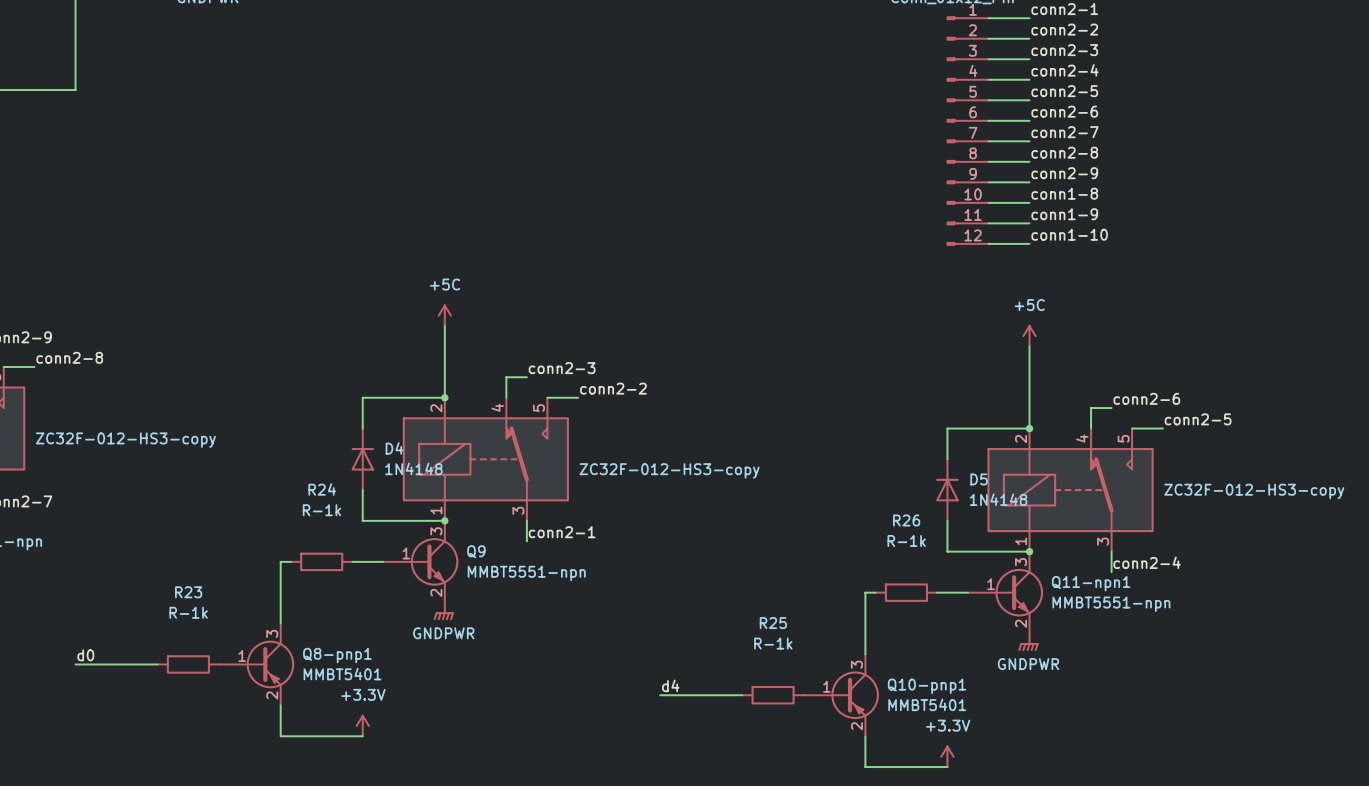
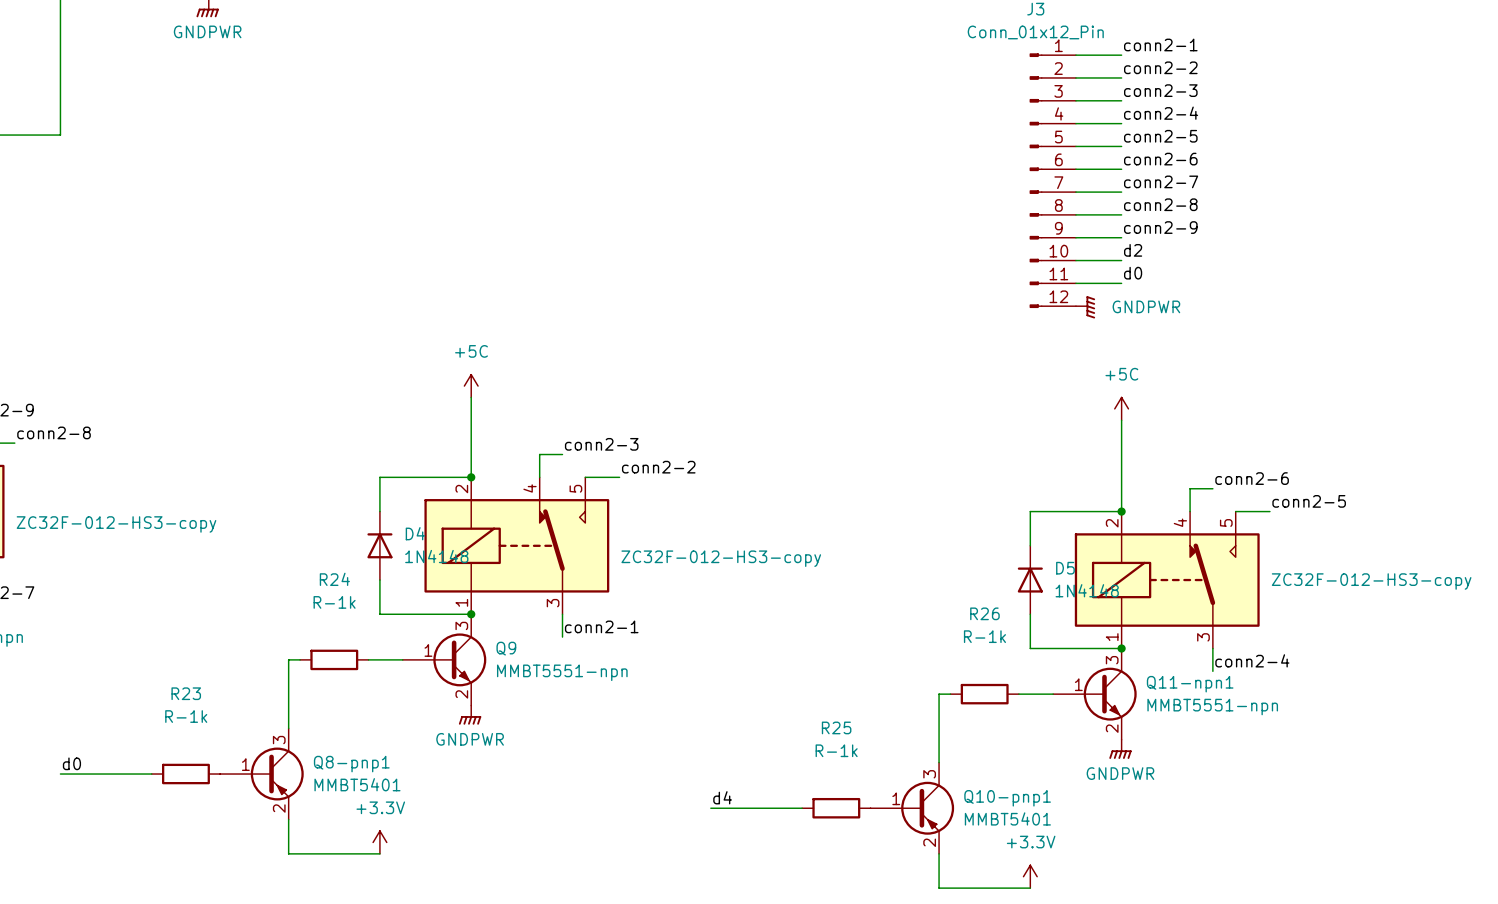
label: conn1-8 (1064, 193) -> d2 (1133, 250)
label: conn1-9 (1064, 214) -> d0 (1133, 273)
label: conn1-10 (1069, 234) -> none
wire: (988, 243) (1029, 243) -> none
power symbol: none -> GNDPWR (1085, 307)

